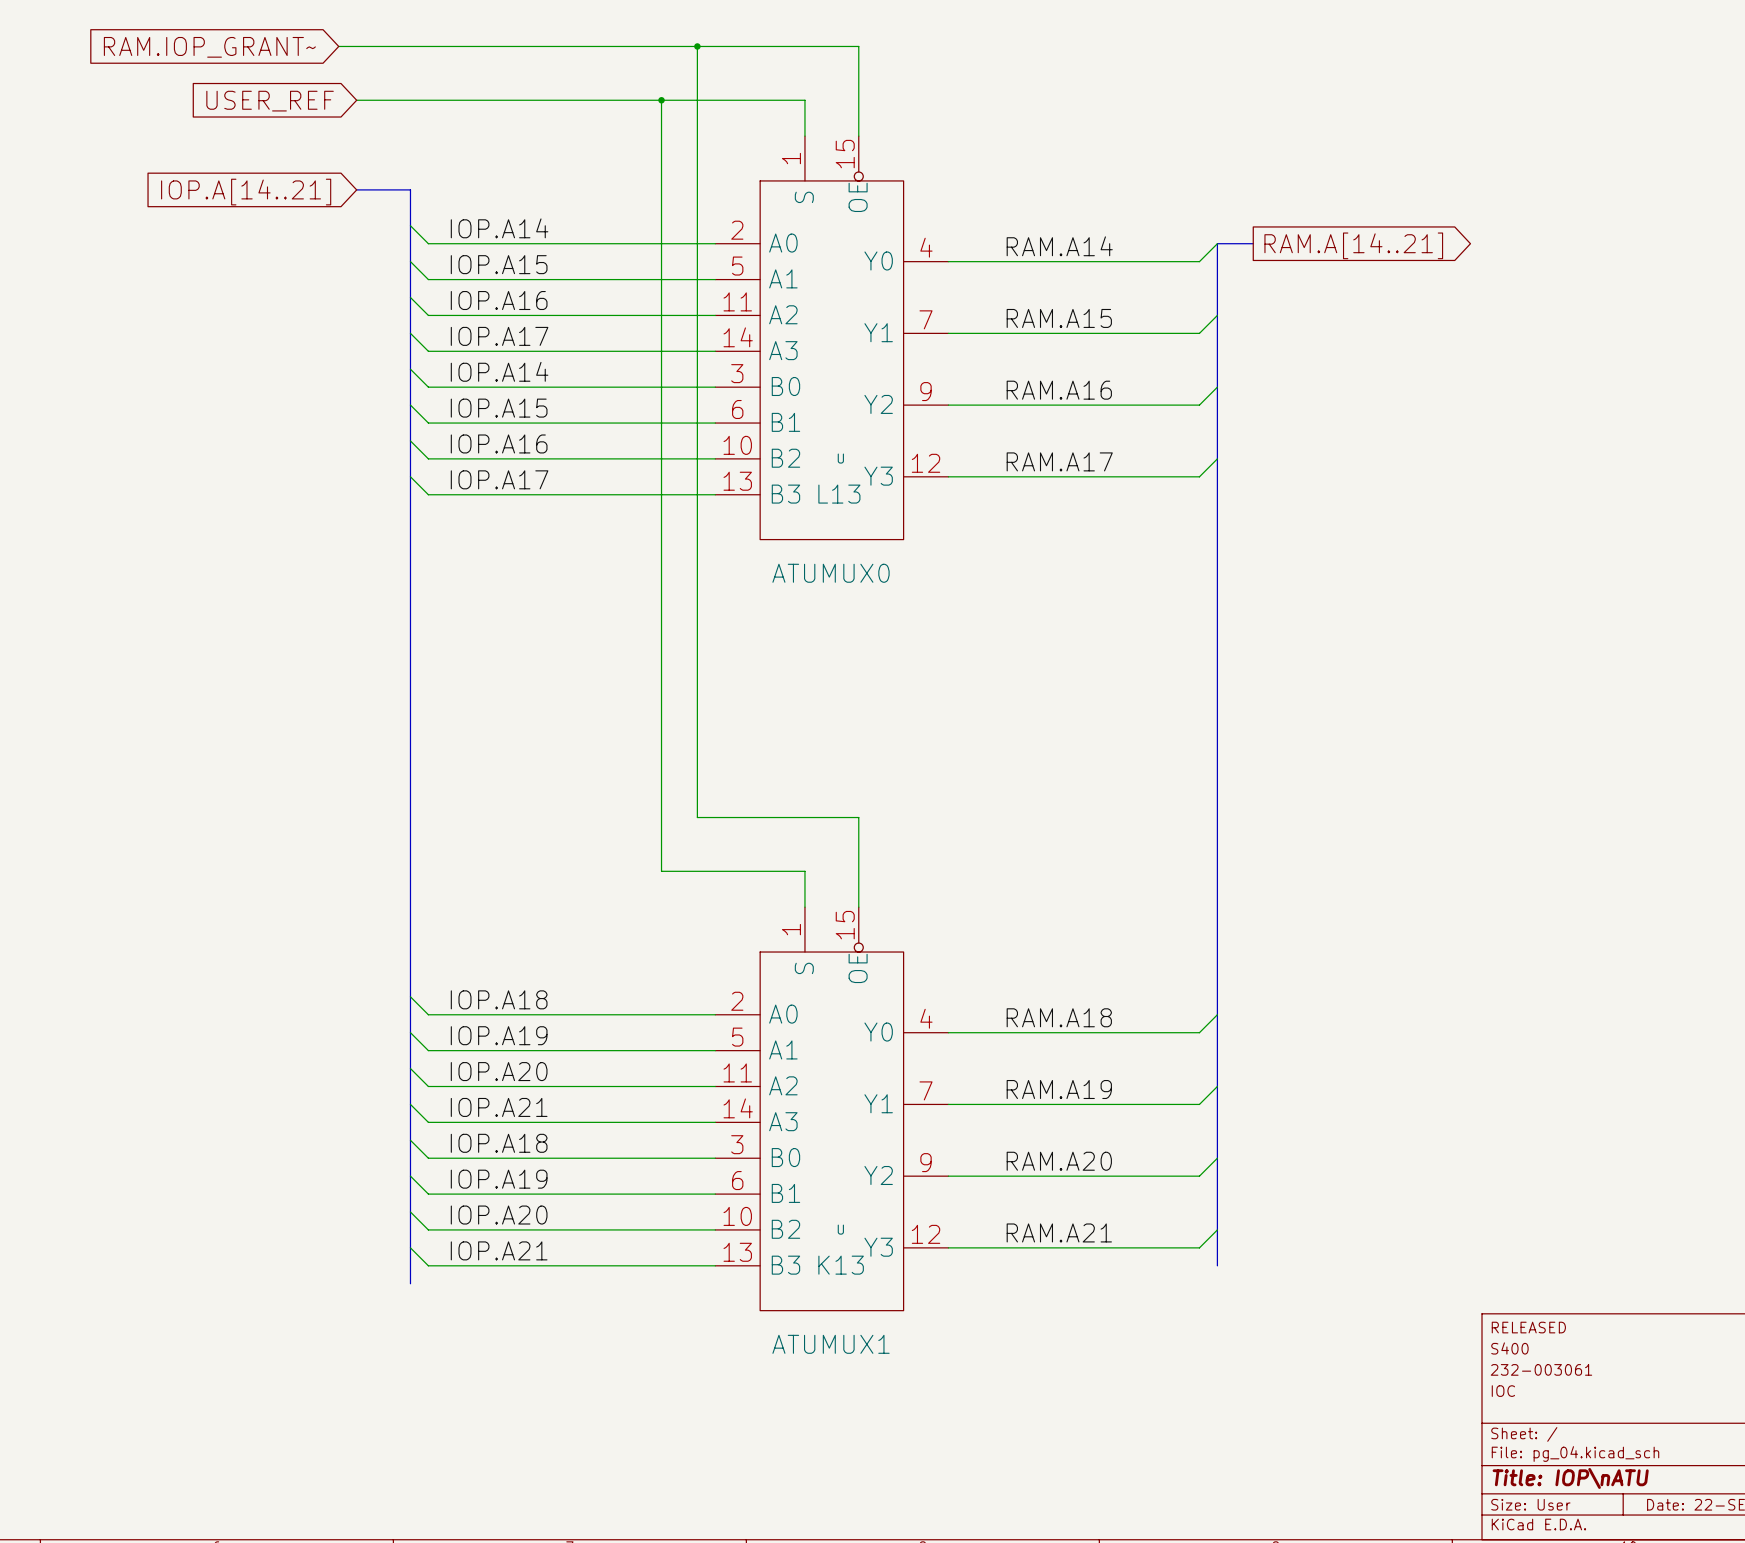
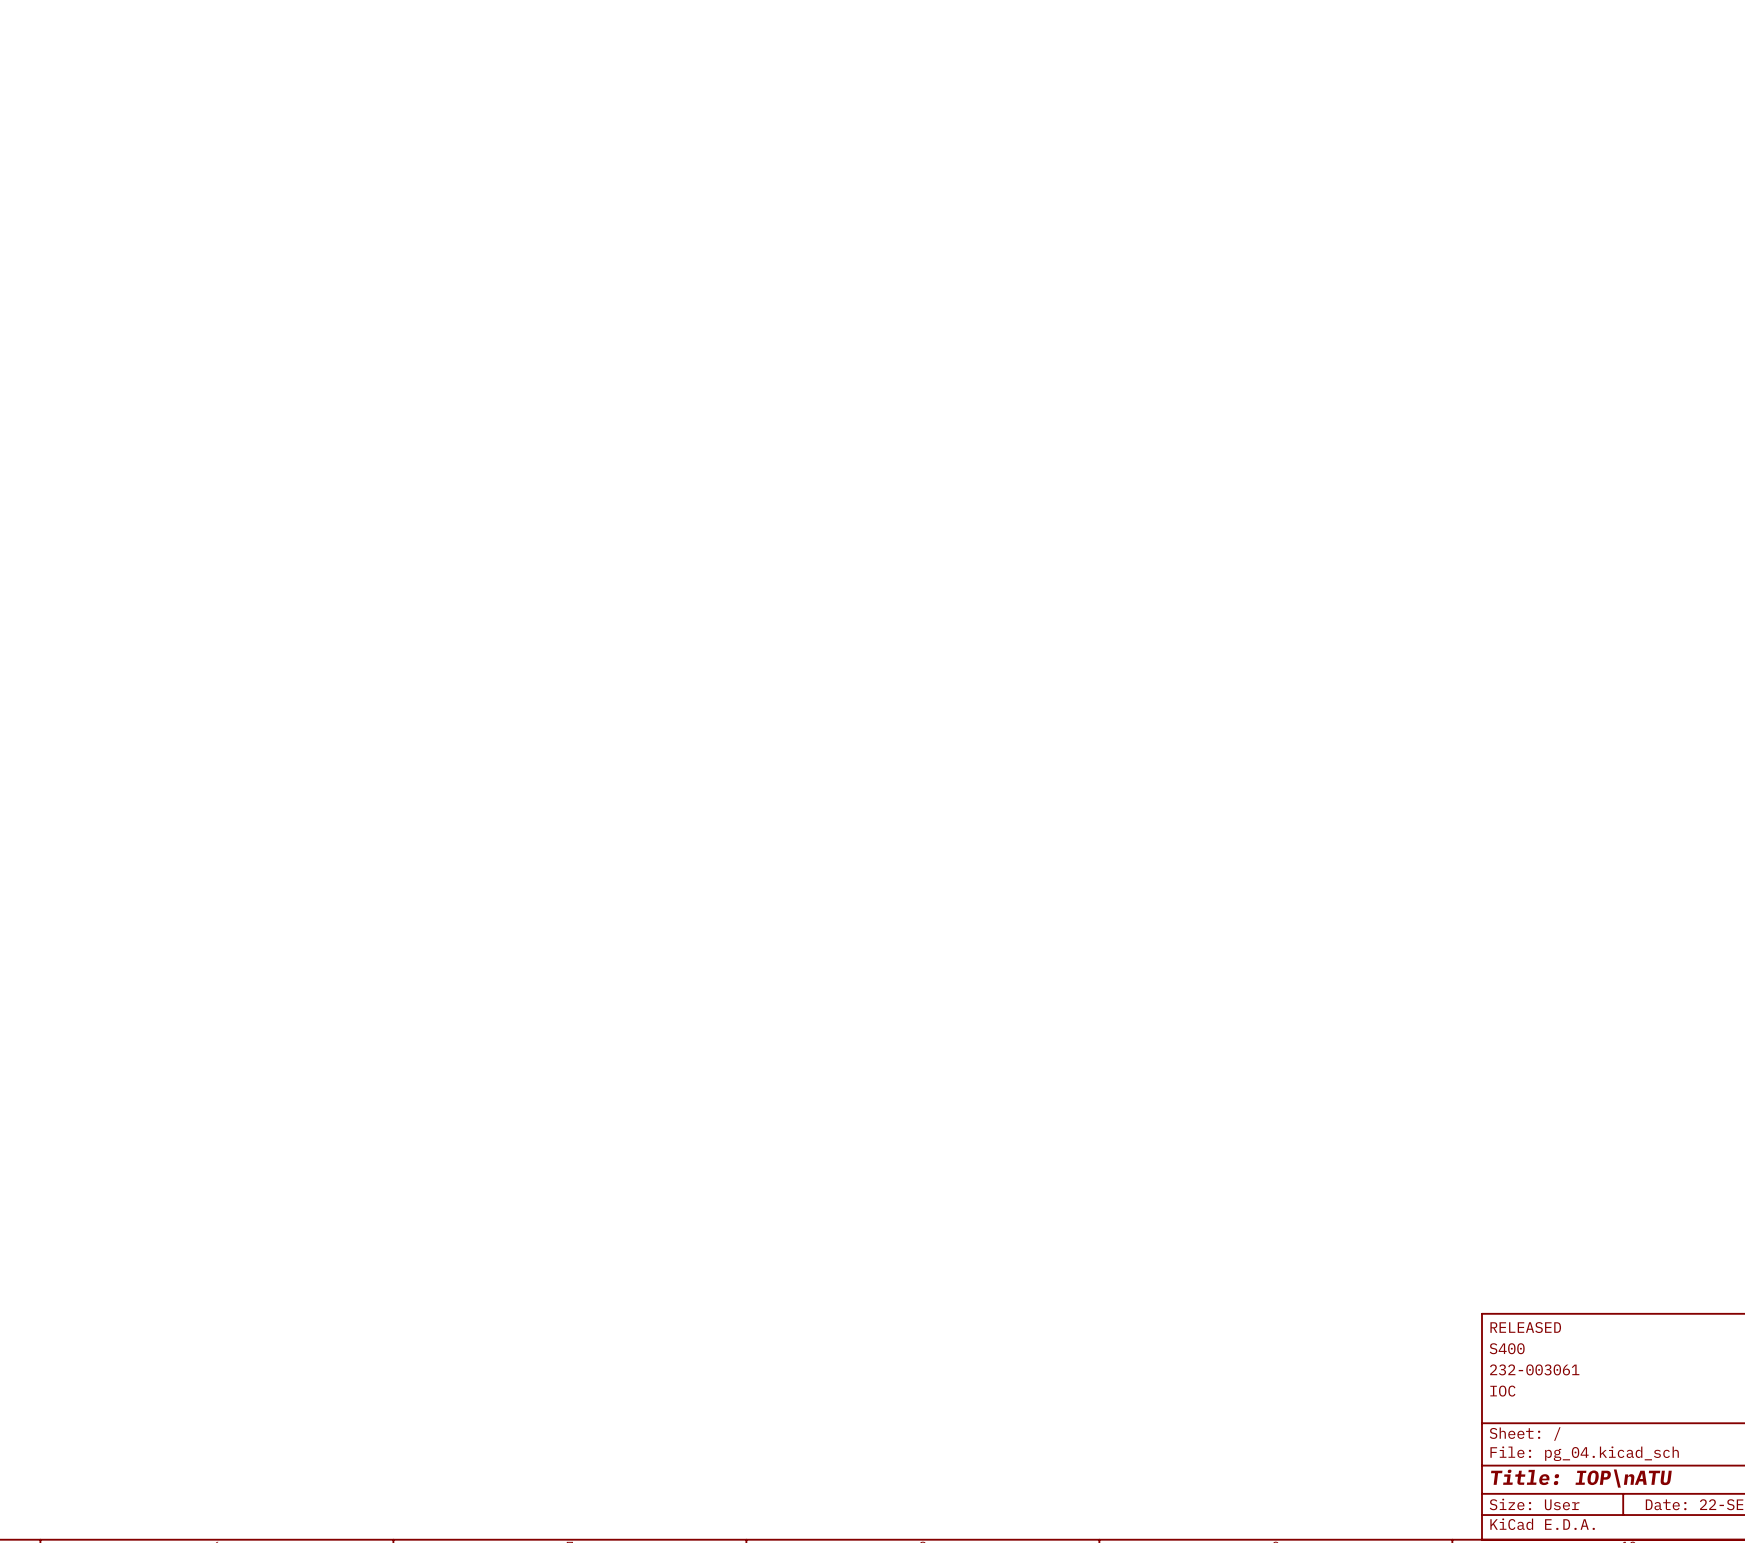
wire: (338, 46) (858, 46) (858, 136) -> none
wire: (697, 46) (697, 817) (858, 817) (858, 907) -> none
junction: (697, 46) -> none
global label: RAM.IOP_GRANT~ (209, 47) -> none
wire: (356, 100) (804, 100) (804, 136) -> none
wire: (661, 100) (661, 871) (804, 871) (804, 907) -> none
junction: (661, 100) -> none
global label: USER_REF (270, 101) -> none
bus: (356, 189) (410, 189) (410, 1283) -> none
global label: IOP.A[14..21] (246, 192) -> none
wire: (410, 225) (428, 243) (715, 243) -> none
label: IOP.A14 (499, 228) -> none
wire: (1217, 243) (1199, 261) (948, 261) -> none
bus: (1253, 243) (1217, 243) (1217, 1265) -> none
global label: RAM.A[14..21] (1353, 245) -> none
label: RAM.A14 (1059, 246) -> none
wire: (410, 261) (428, 279) (715, 279) -> none
label: IOP.A15 (499, 264) -> none
wire: (410, 297) (428, 315) (715, 315) -> none
label: IOP.A16 (499, 300) -> none
wire: (1217, 315) (1199, 333) (948, 333) -> none
label: RAM.A15 (1059, 318) -> none
wire: (410, 333) (428, 351) (715, 351) -> none
label: IOP.A17 (499, 336) -> none
U: (831, 337) -> none
wire: (410, 369) (428, 387) (715, 387) -> none
label: IOP.A14 (499, 371) -> none
wire: (1217, 387) (1199, 405) (948, 405) -> none
label: RAM.A16 (1059, 390) -> none
wire: (410, 405) (428, 423) (715, 423) -> none
label: IOP.A15 (499, 408) -> none
wire: (410, 440) (428, 458) (715, 458) -> none
label: IOP.A16 (499, 443) -> none
wire: (1217, 458) (1199, 476) (948, 476) -> none
label: RAM.A17 (1059, 461) -> none
wire: (410, 476) (428, 494) (715, 494) -> none
label: IOP.A17 (499, 479) -> none
wire: (410, 996) (428, 1014) (715, 1014) -> none
label: IOP.A18 (499, 999) -> none
wire: (1217, 1014) (1199, 1032) (948, 1032) -> none
label: RAM.A18 (1059, 1017) -> none
wire: (410, 1032) (428, 1050) (715, 1050) -> none
label: IOP.A19 (499, 1035) -> none
wire: (410, 1068) (428, 1086) (715, 1086) -> none
label: IOP.A20 (499, 1071) -> none
wire: (1217, 1086) (1199, 1104) (948, 1104) -> none
label: RAM.A19 (1059, 1089) -> none
wire: (410, 1104) (428, 1122) (715, 1122) -> none
label: IOP.A21 (499, 1107) -> none
U: (831, 1108) -> none
wire: (410, 1140) (428, 1158) (715, 1158) -> none
label: IOP.A18 (499, 1143) -> none
wire: (1217, 1158) (1199, 1176) (948, 1176) -> none
label: RAM.A20 (1059, 1161) -> none
wire: (410, 1176) (428, 1194) (715, 1194) -> none
label: IOP.A19 (499, 1179) -> none
wire: (410, 1212) (428, 1229) (715, 1229) -> none
label: IOP.A20 (499, 1215) -> none
wire: (1217, 1229) (1199, 1247) (948, 1247) -> none
label: RAM.A21 (1059, 1232) -> none
wire: (410, 1247) (428, 1265) (715, 1265) -> none
label: IOP.A21 (499, 1250) -> none

